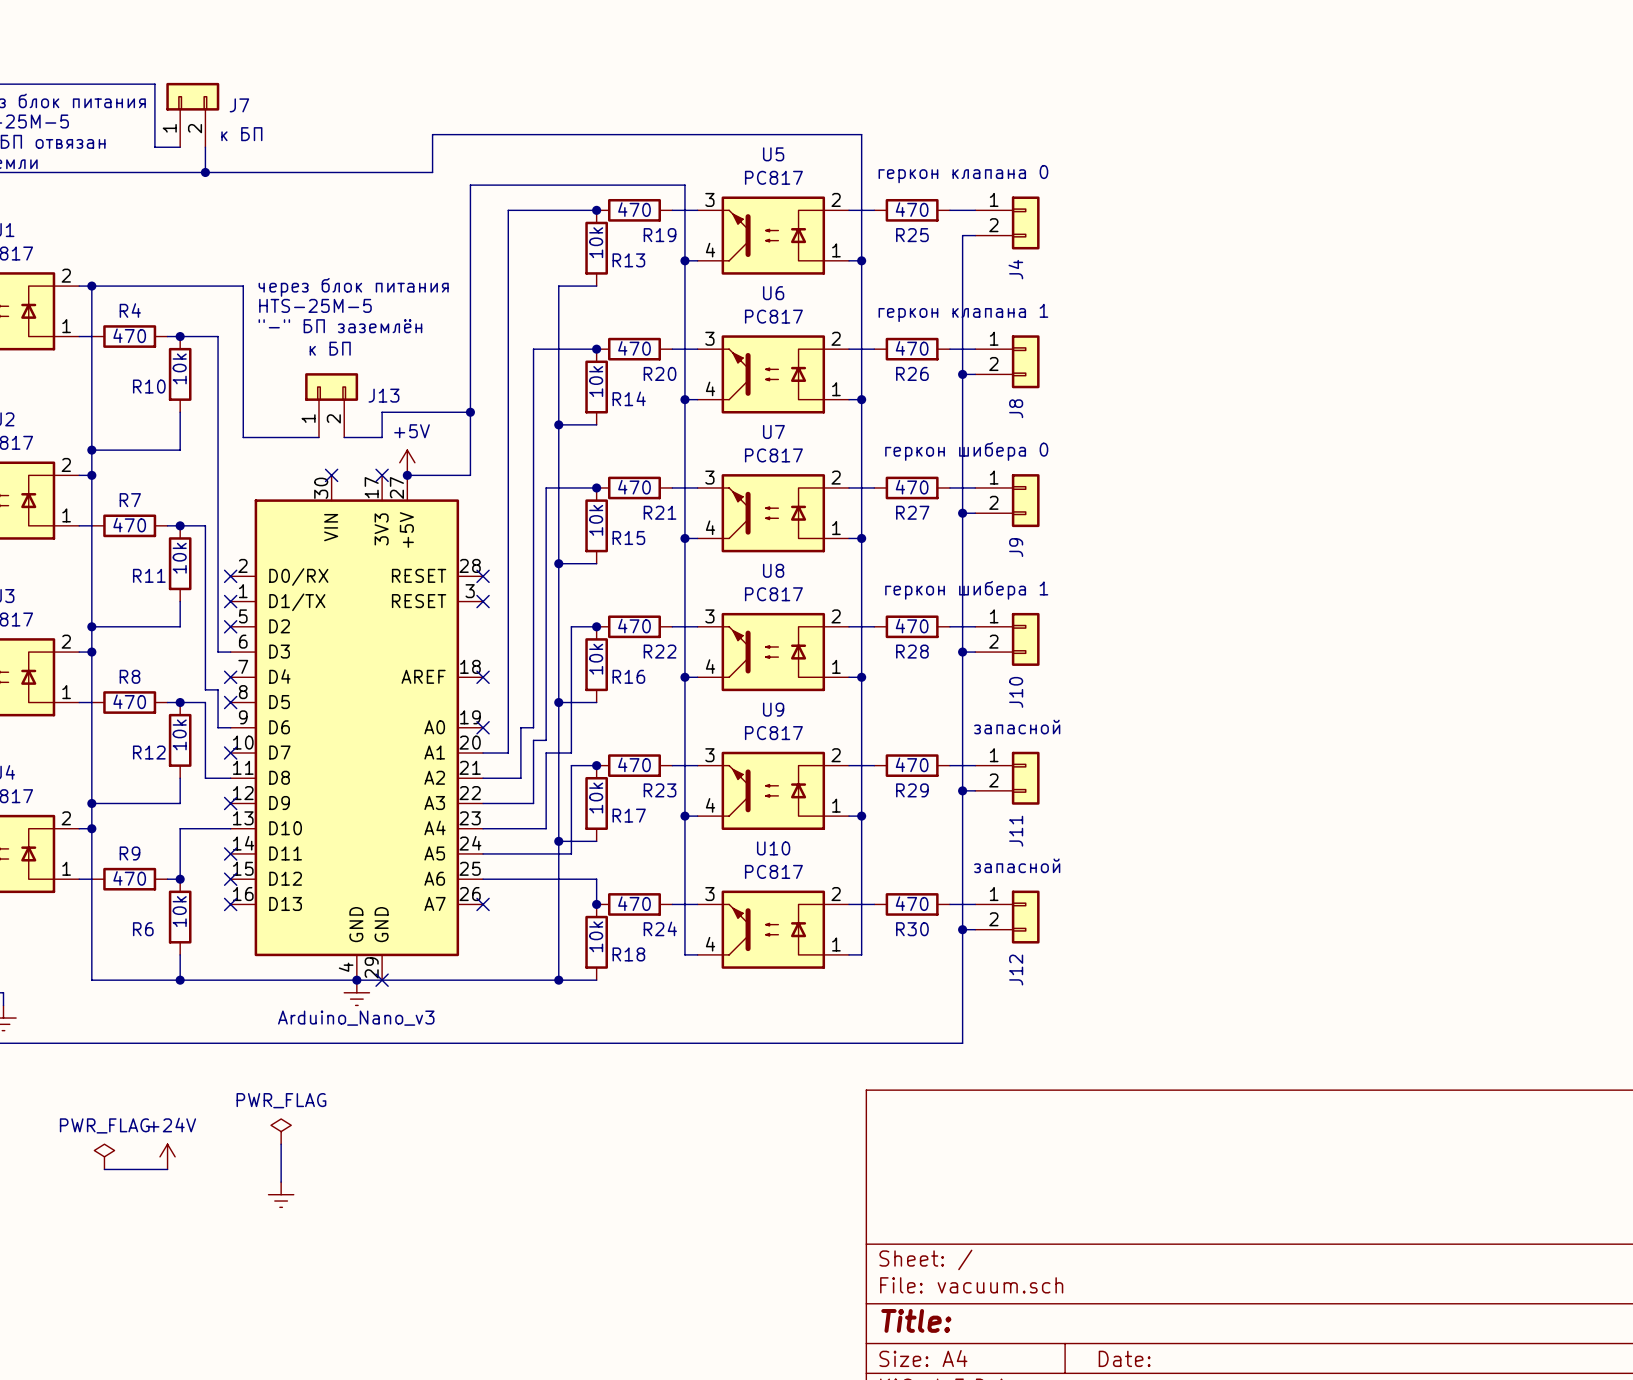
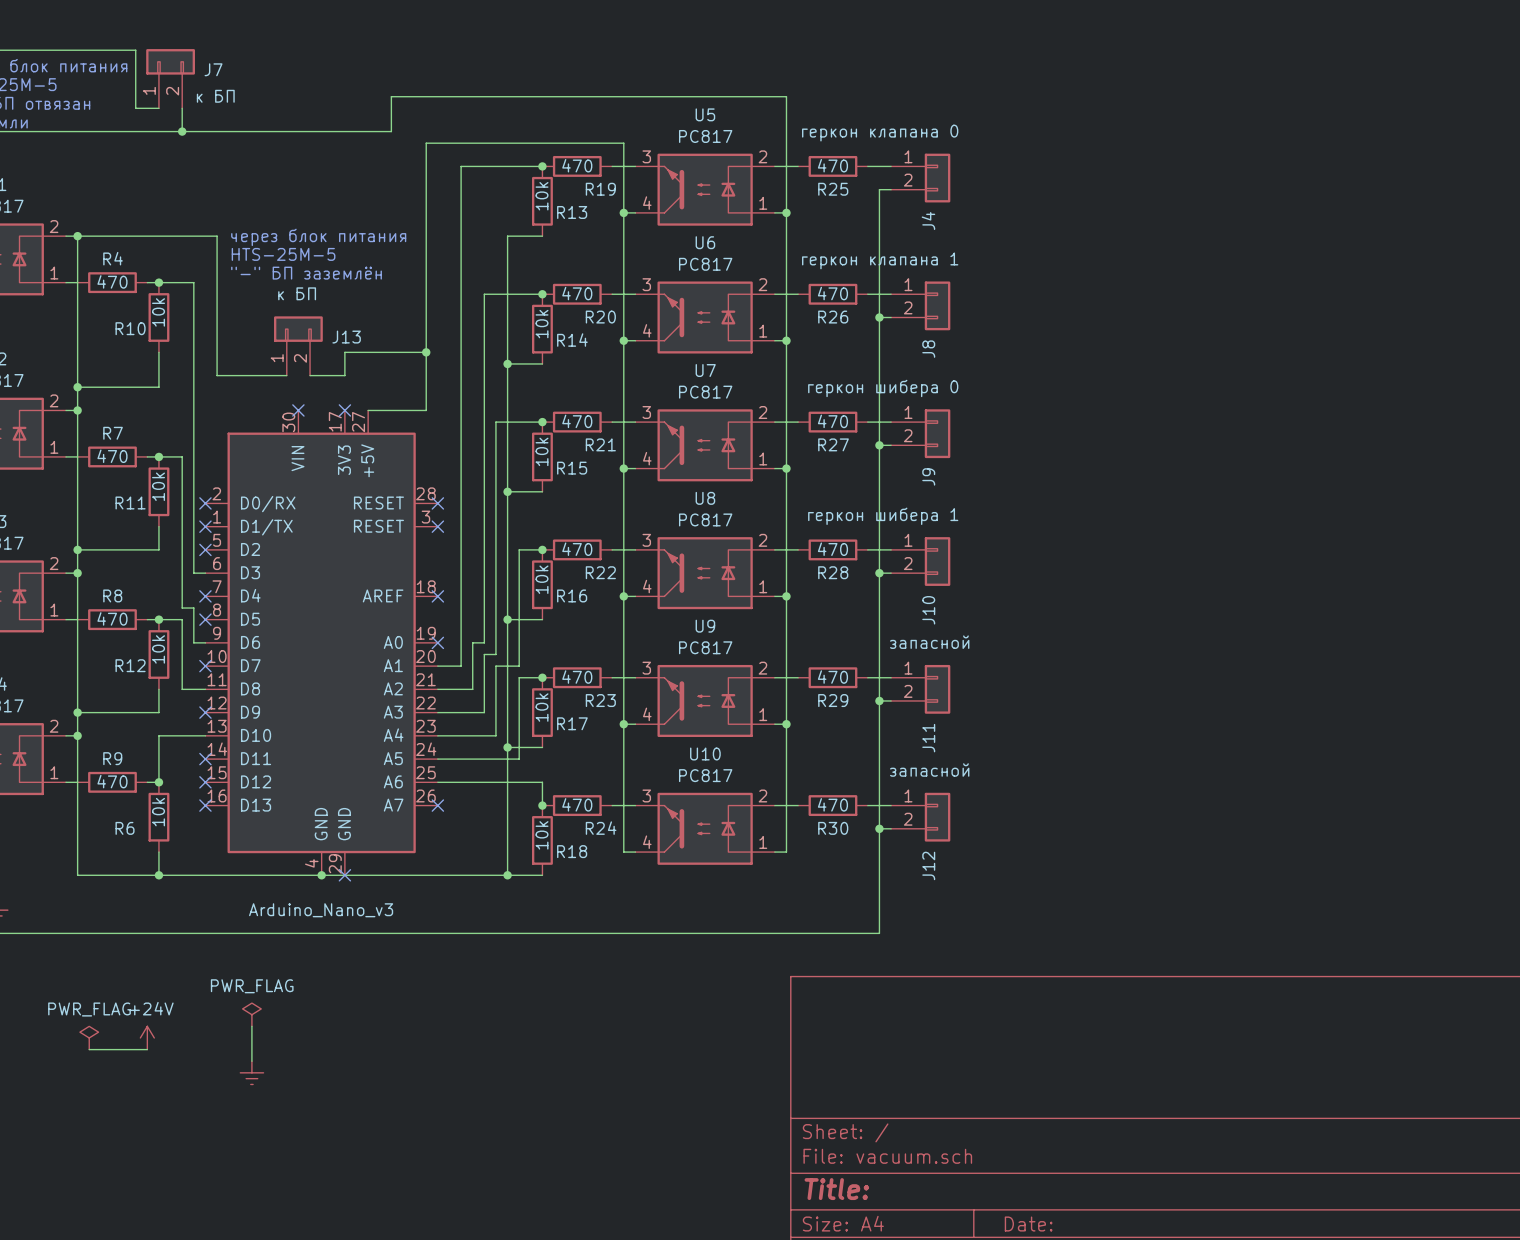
power symbol: +5V (407, 462) -> none
junction: (407, 475) -> none
power symbol: (356, 992) -> none

